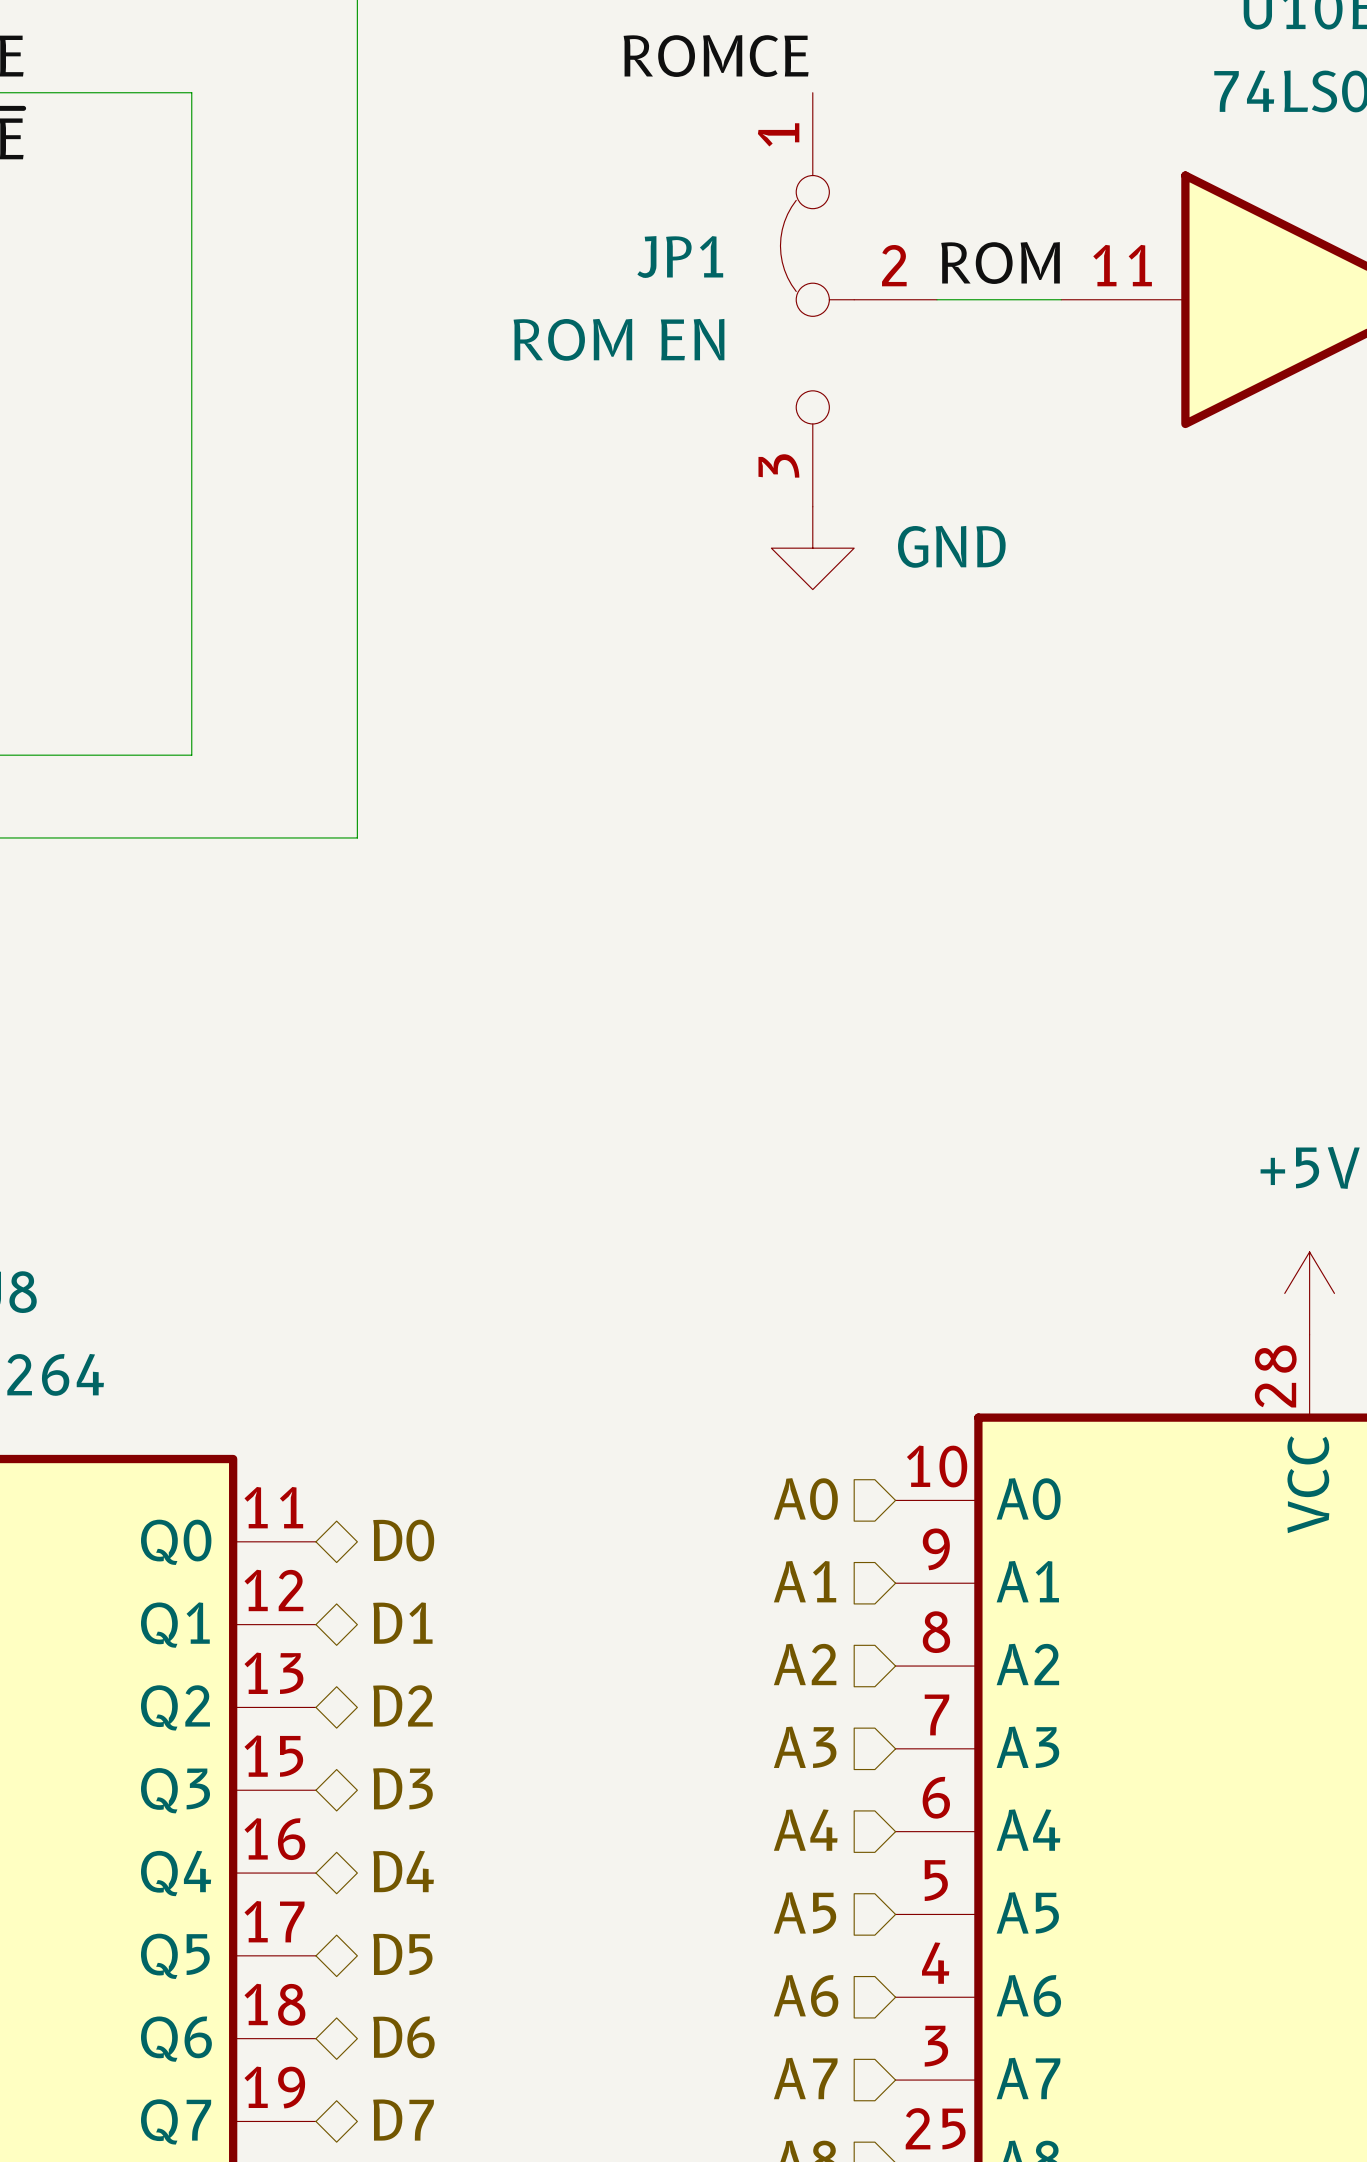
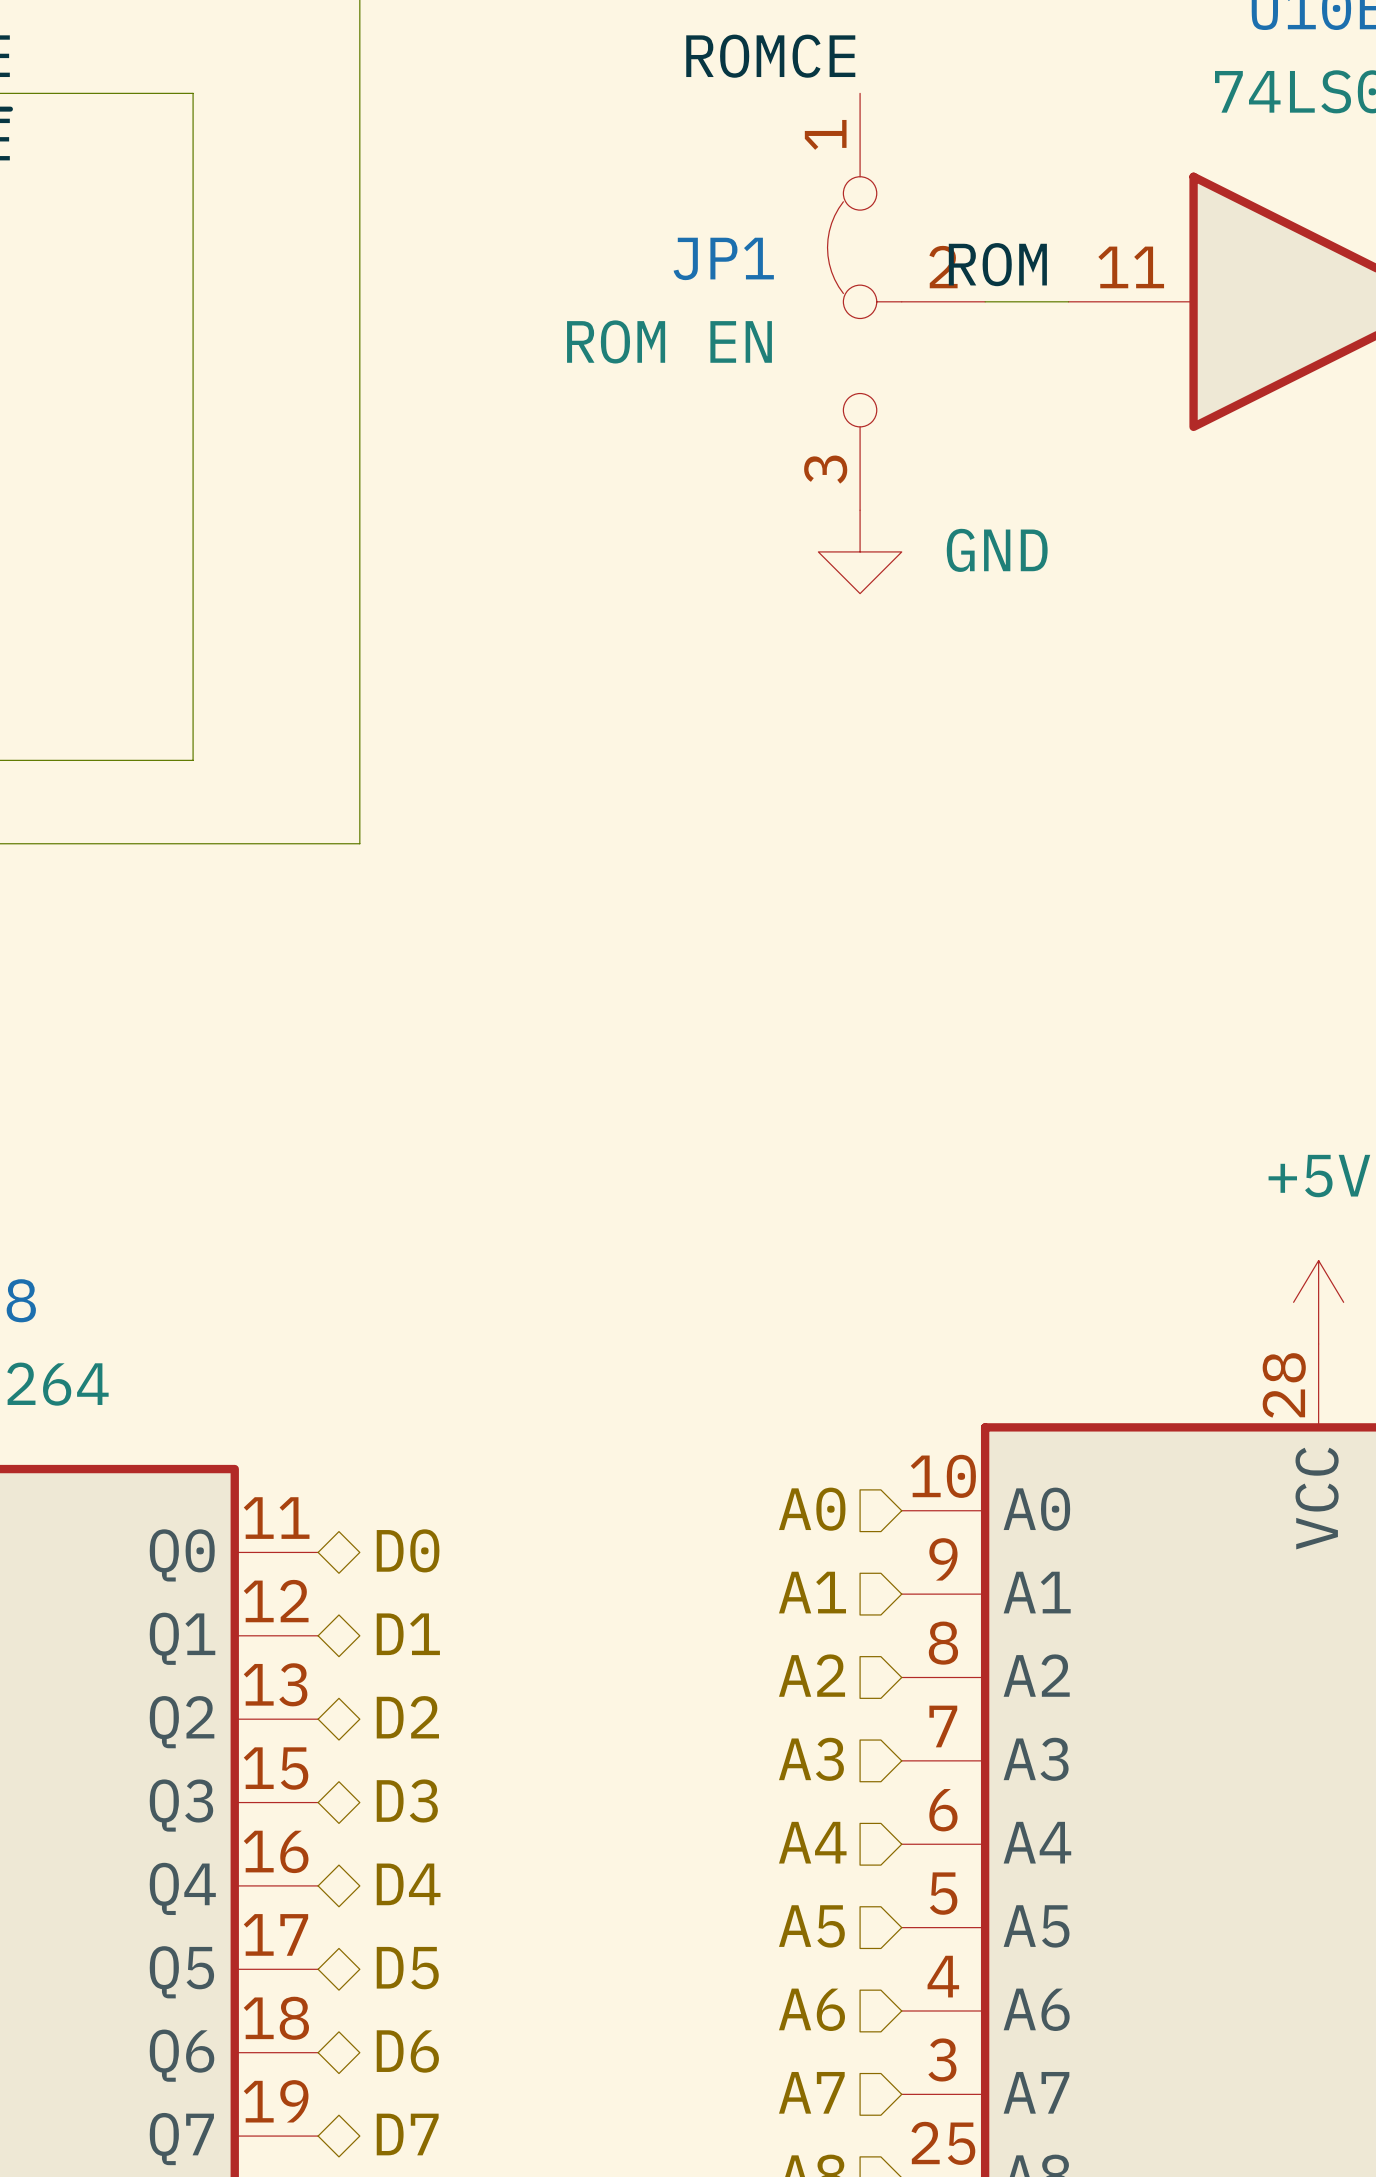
label position: ROMCE (716, 56) -> ROMCE (770, 56)
JP1 position: (858, 299) -> (906, 301)
power symbol position: GND (812, 548) -> GND (860, 551)

